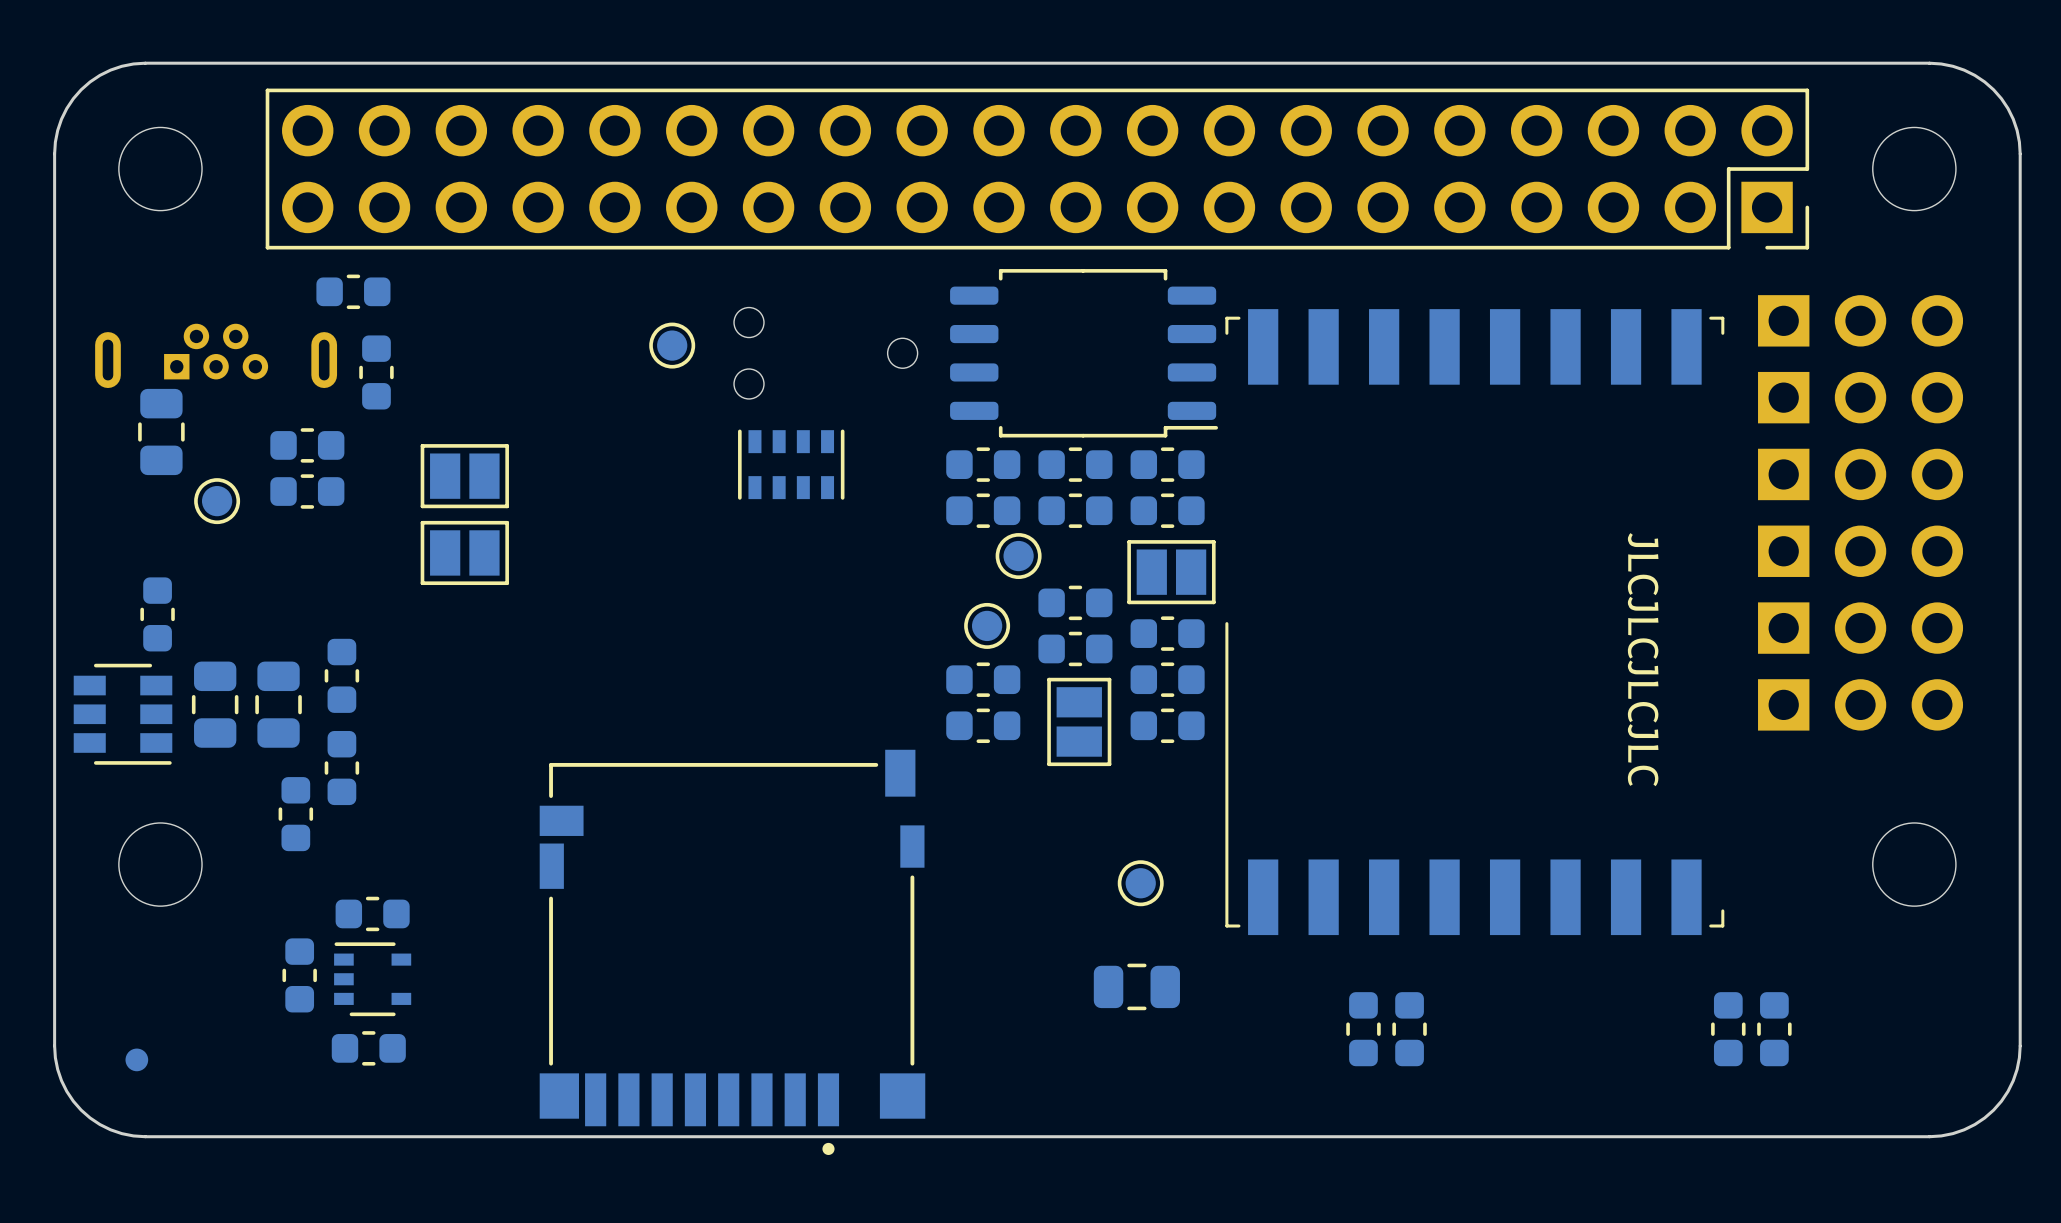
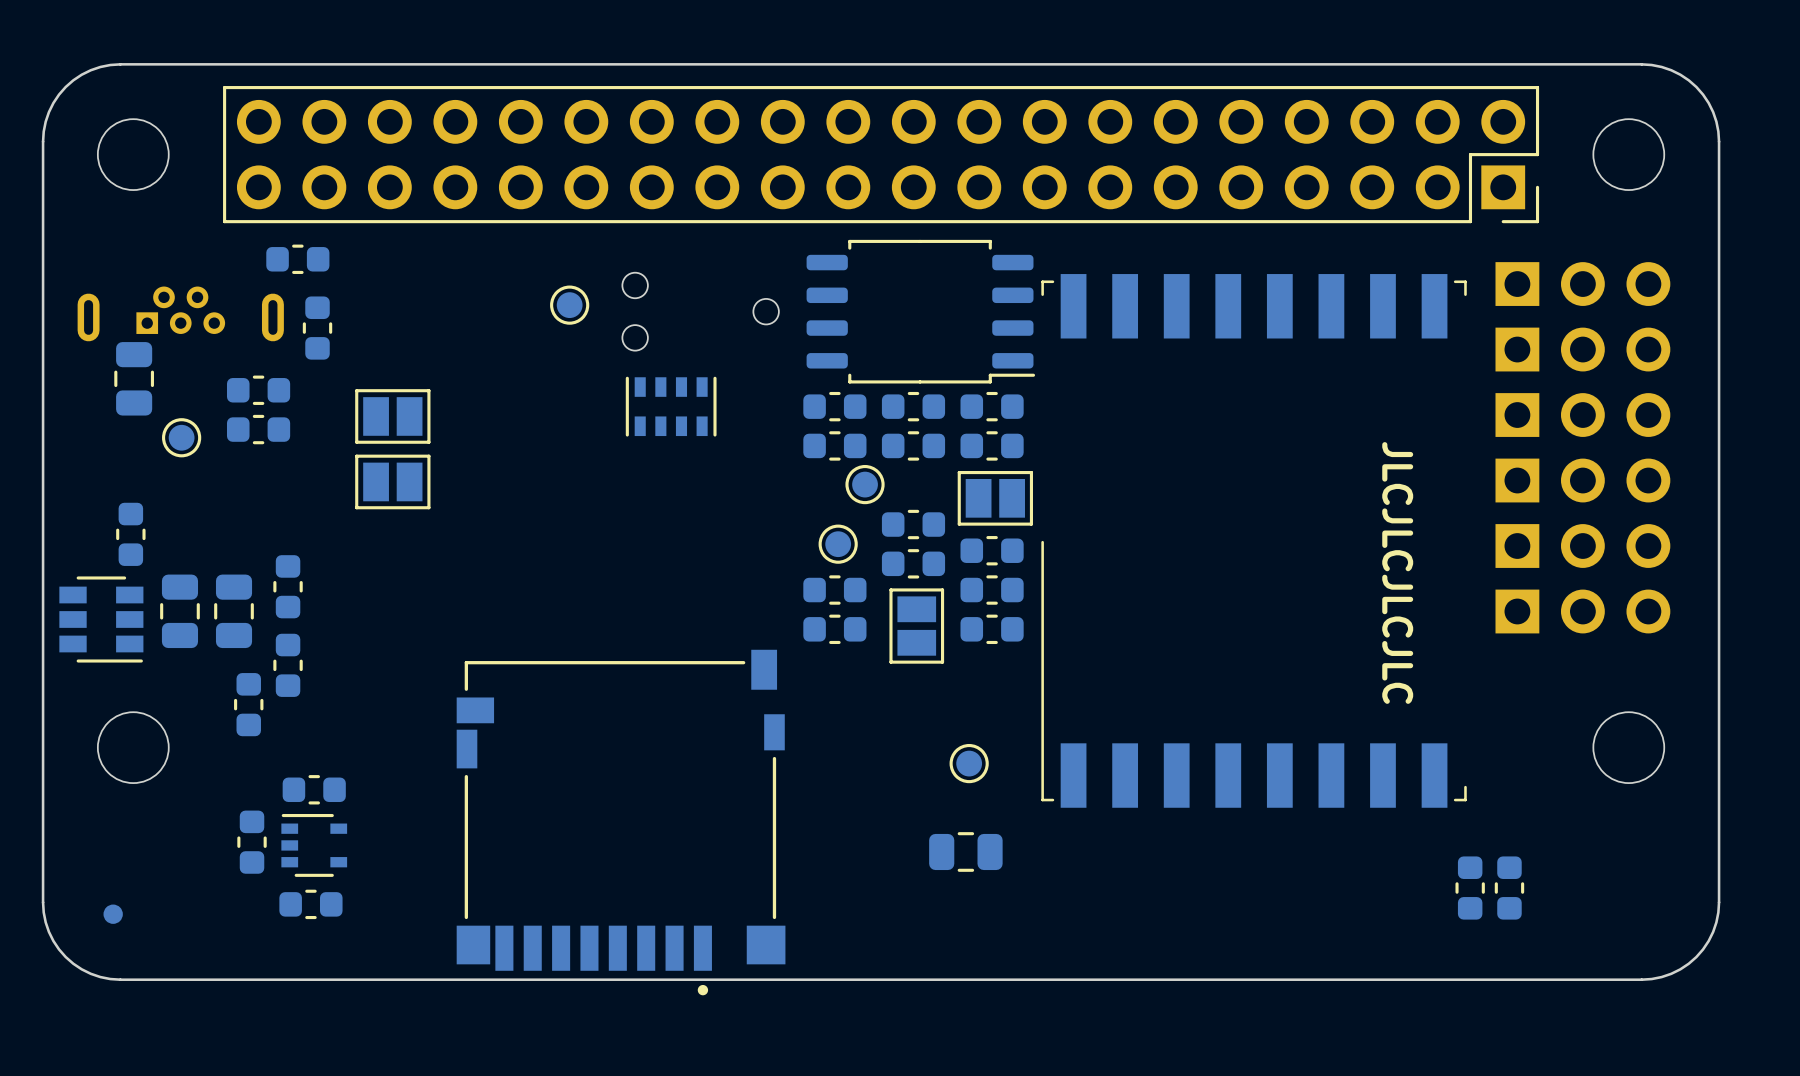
part: (1363, 1029) -> none
part: (1409, 1029) -> none

